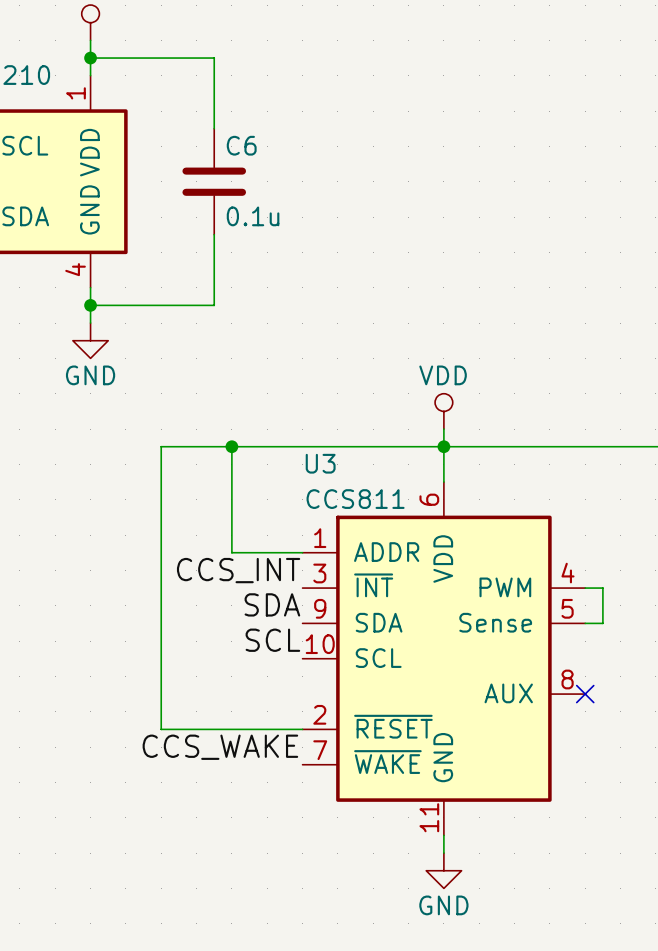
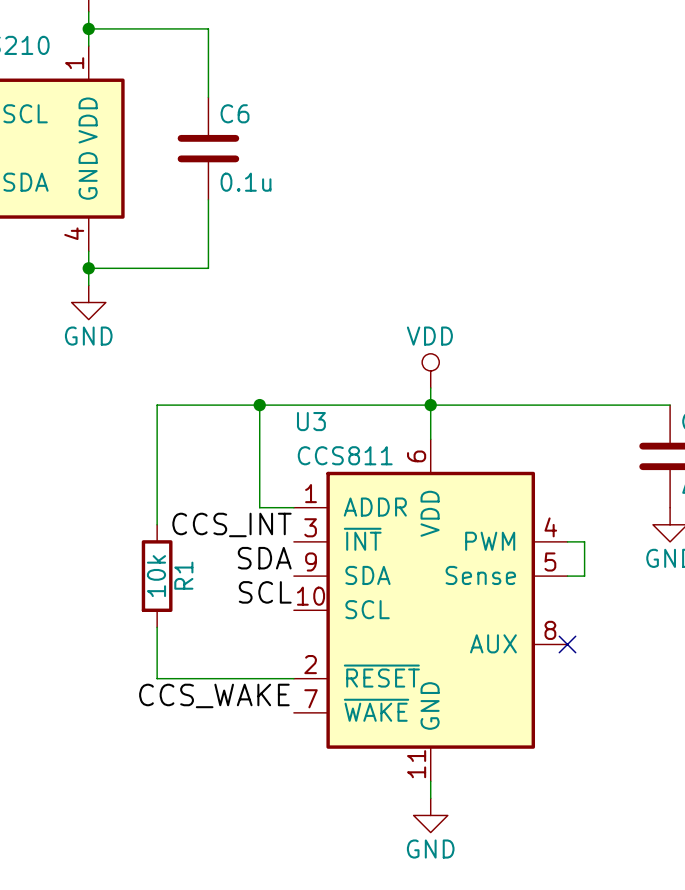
wire: (231, 446) (231, 552) (267, 552) -> (259, 405) (259, 507)
junction position: (231, 446) -> (259, 405)
wire: (161, 570) (161, 676) -> none
R1: none -> 10k (157, 576)

